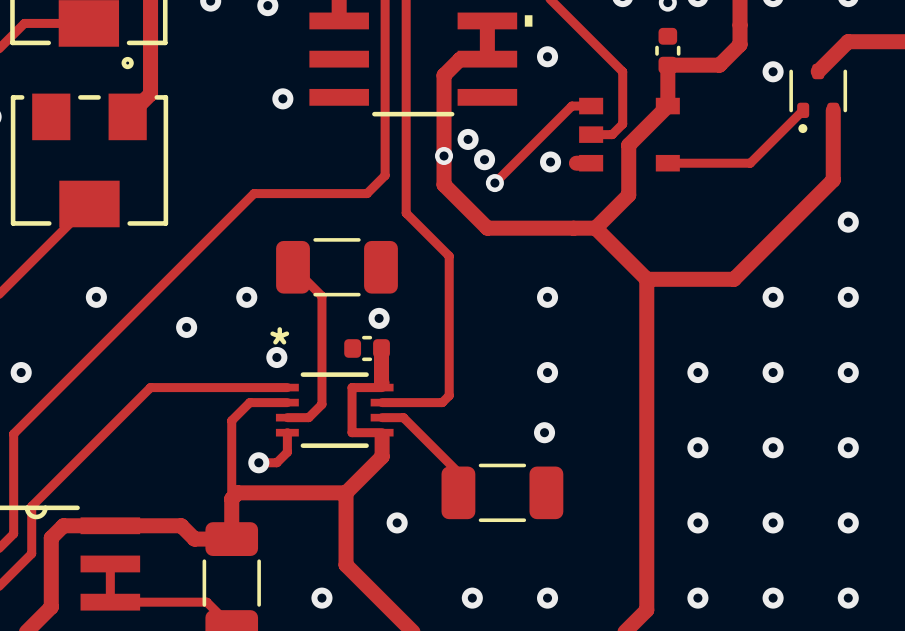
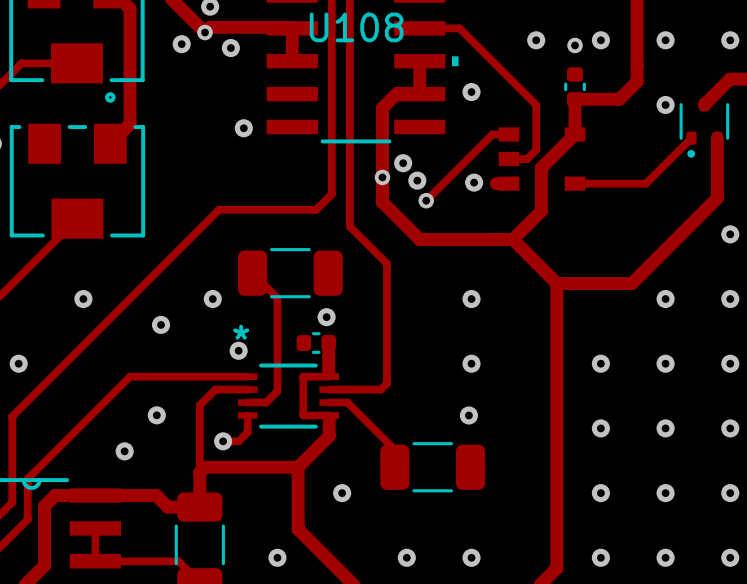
via: none -> (156, 415)
via: none -> (124, 451)

